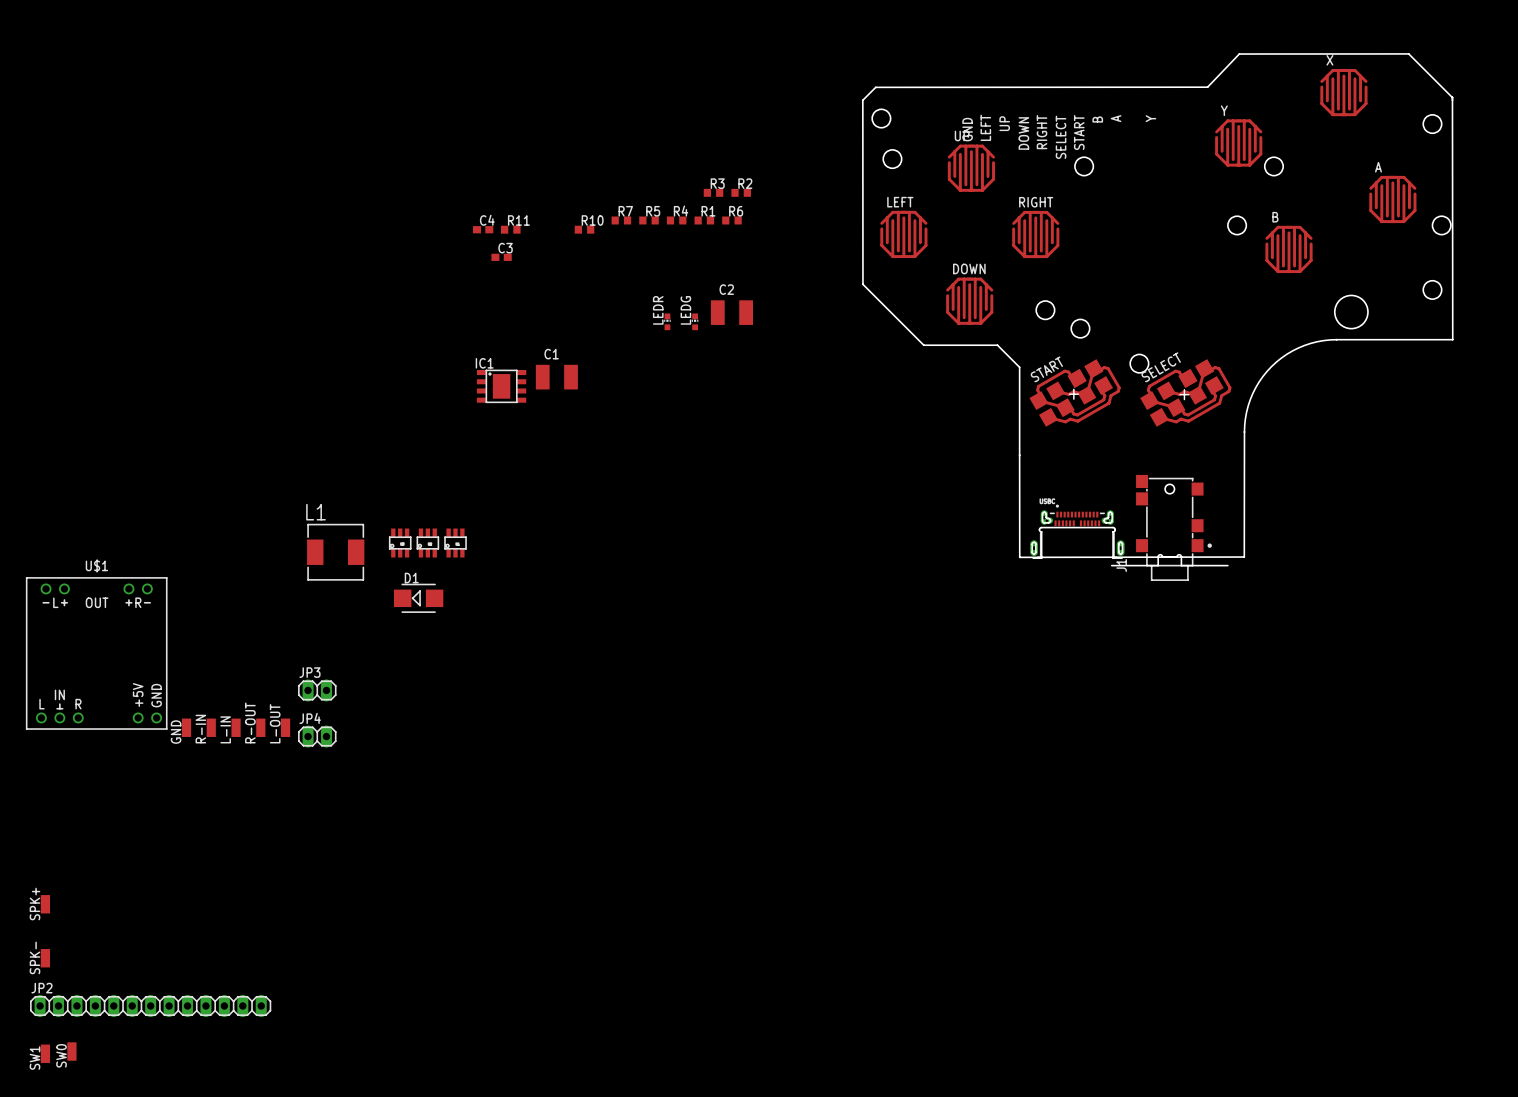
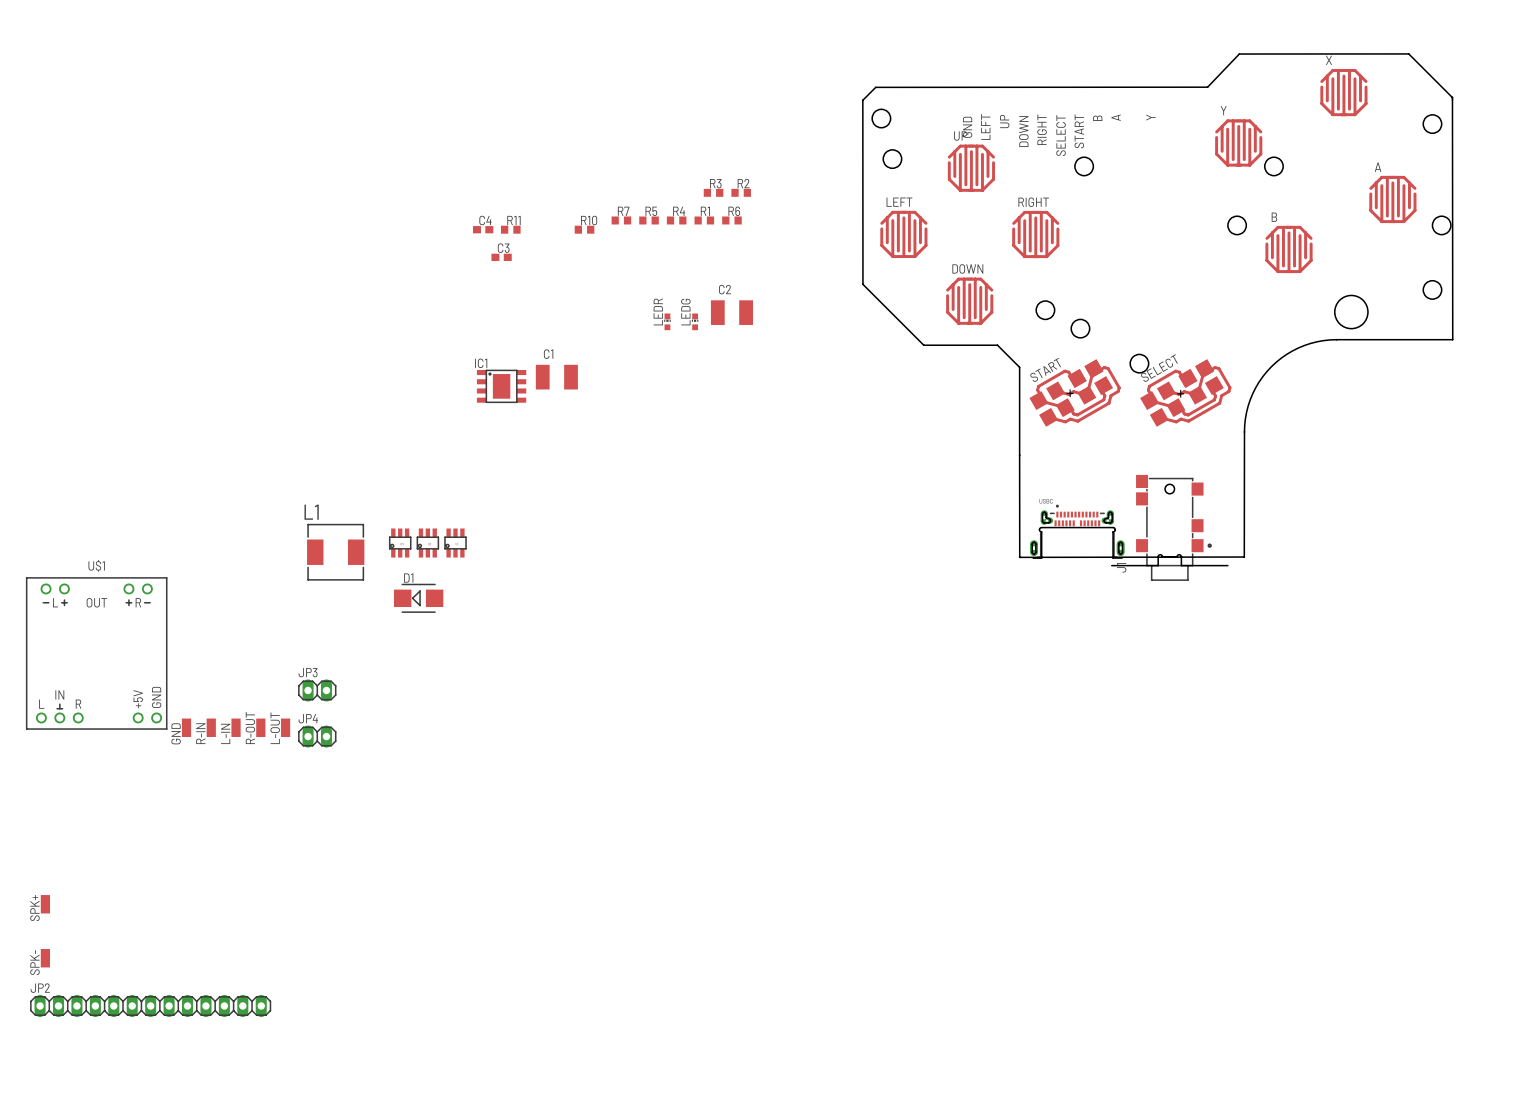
SW0: (71, 1051) -> none
SW1: (45, 1053) -> none

